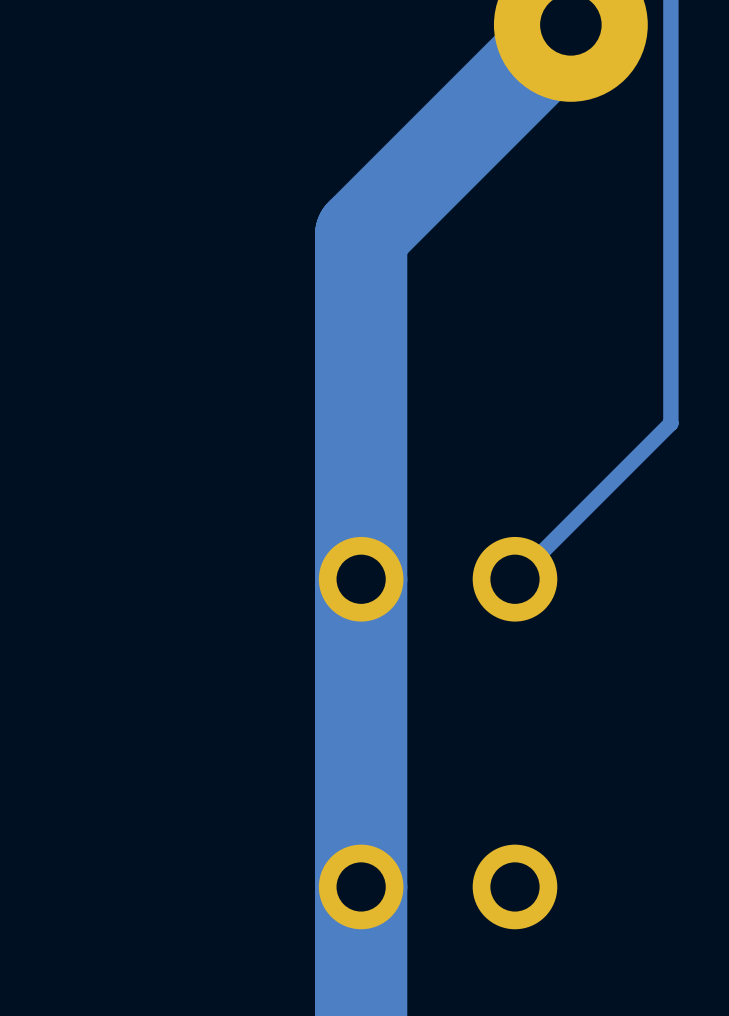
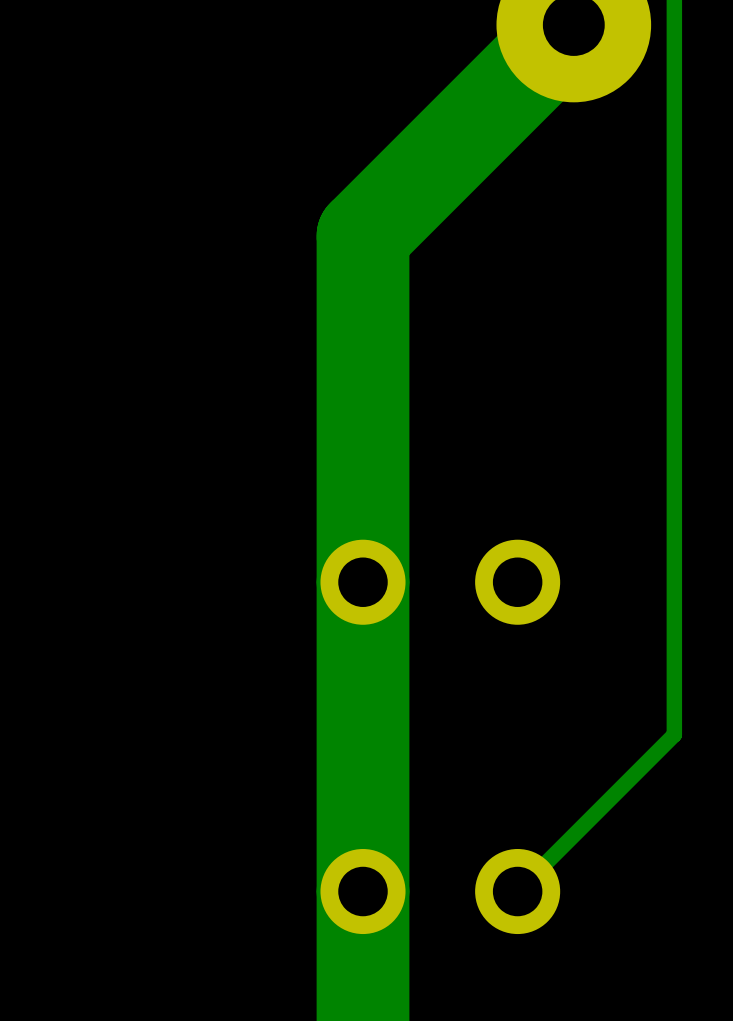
track: (670, 423) (514, 579) -> (674, 425) (674, 734) (517, 891)

